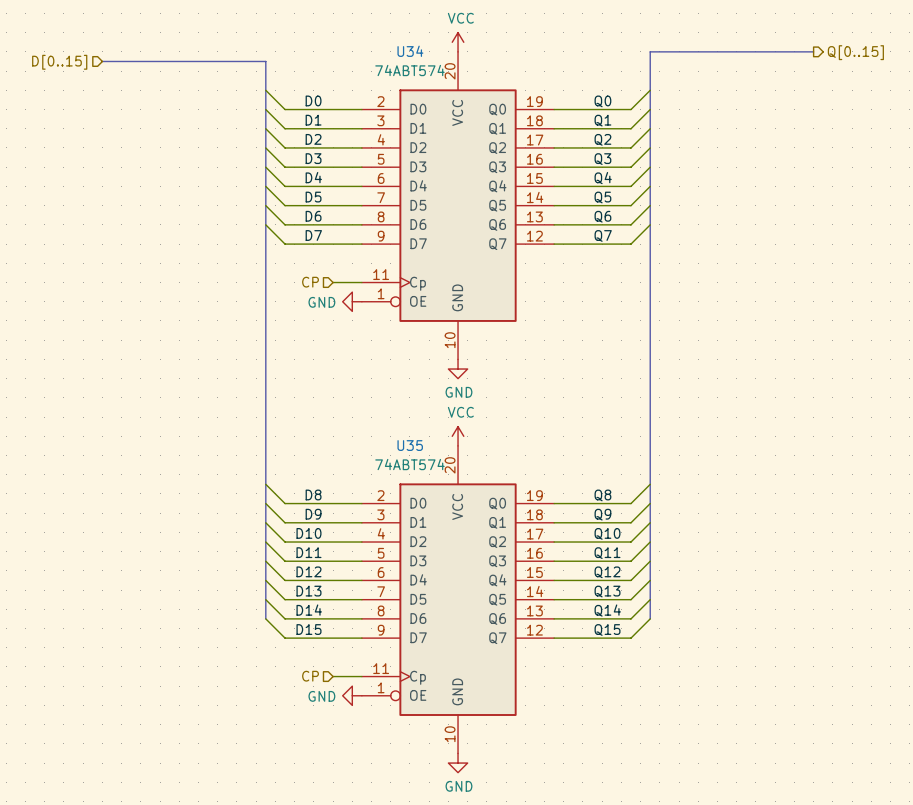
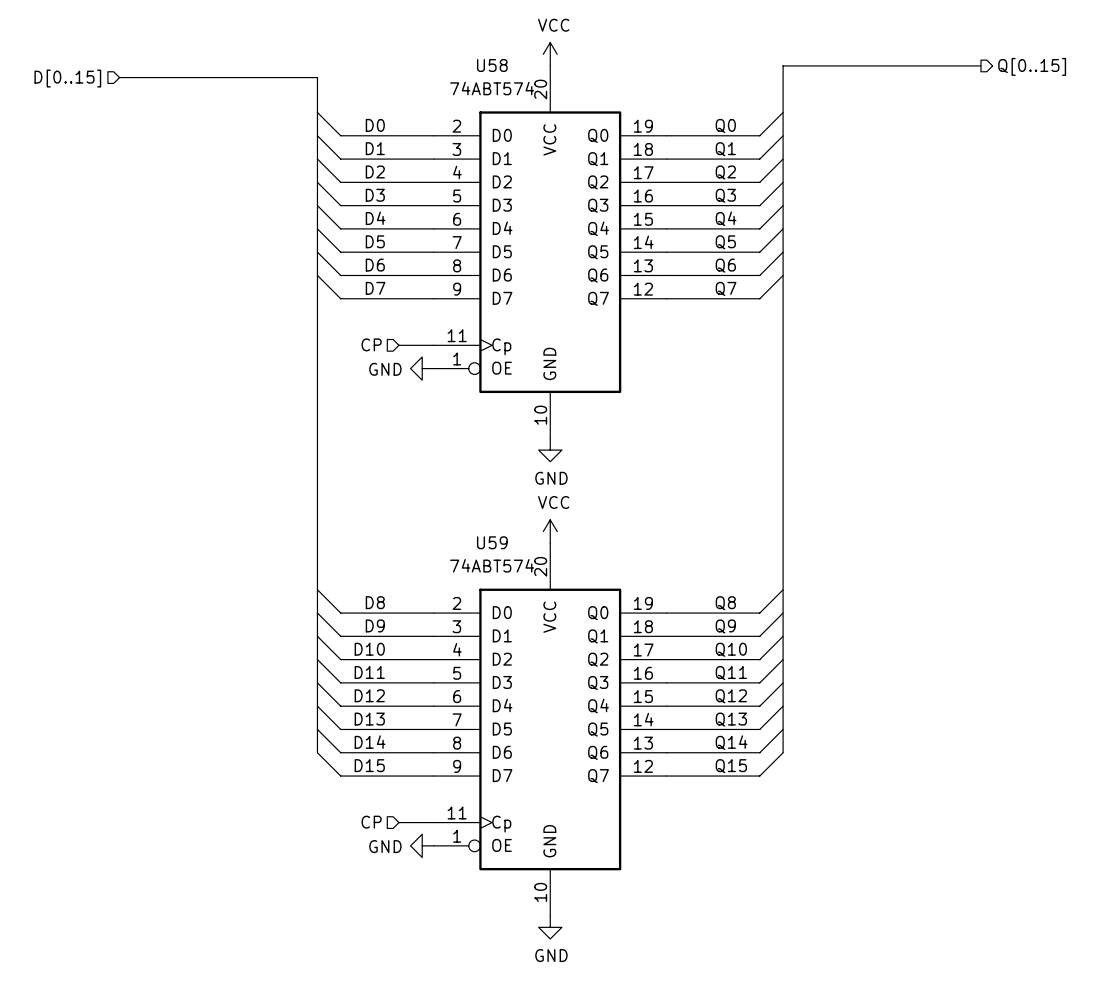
U34 name: U34 (410, 51) -> U58 (492, 65)
U35 name: U35 (410, 445) -> U59 (492, 542)

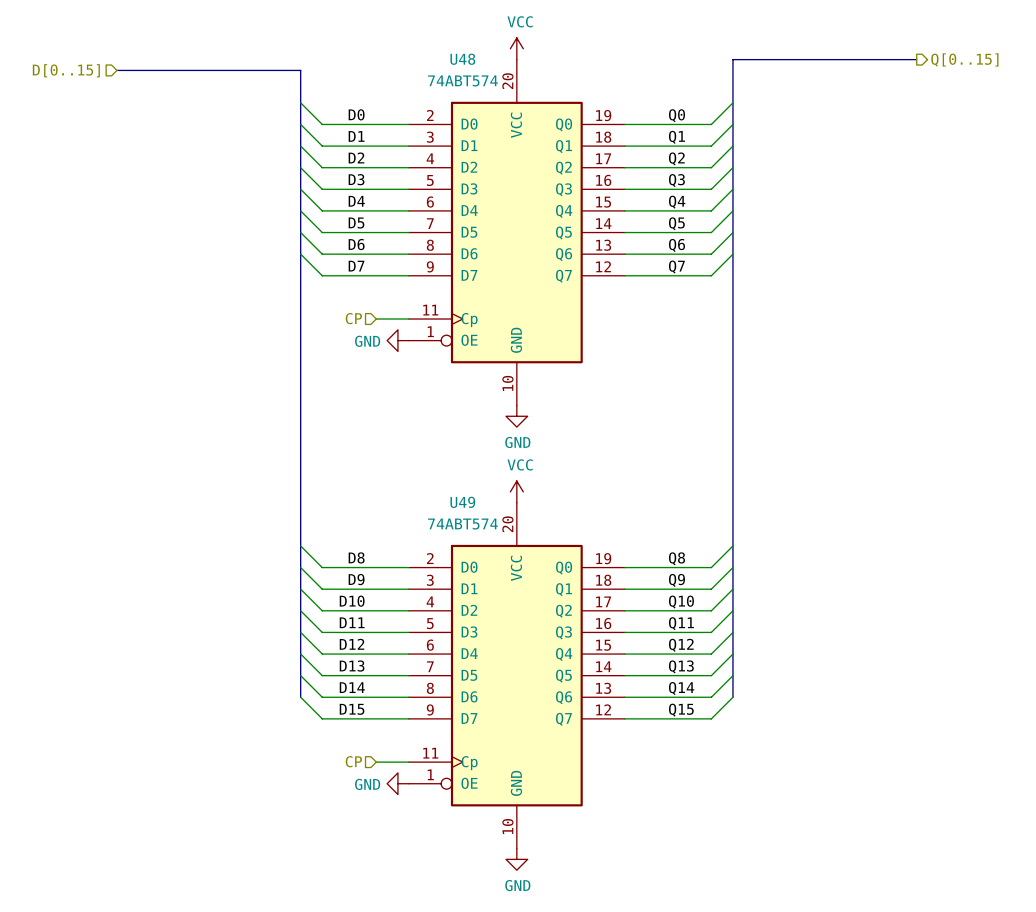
U58 name: U58 (492, 65) -> U48 (462, 59)
U59 name: U59 (492, 542) -> U49 (462, 502)

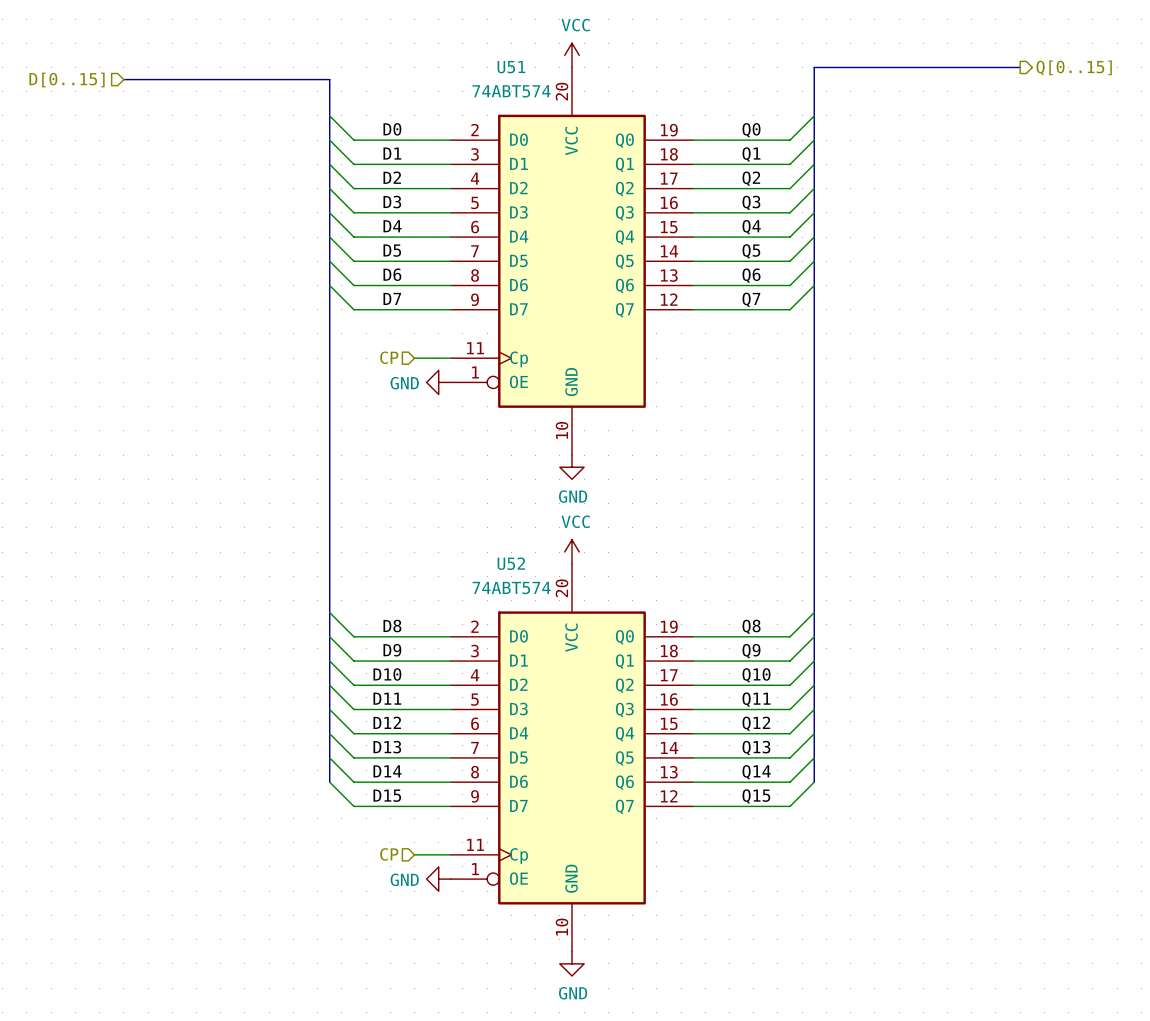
U48 name: U48 (462, 59) -> U51 (511, 67)
U49 name: U49 (462, 502) -> U52 (511, 563)

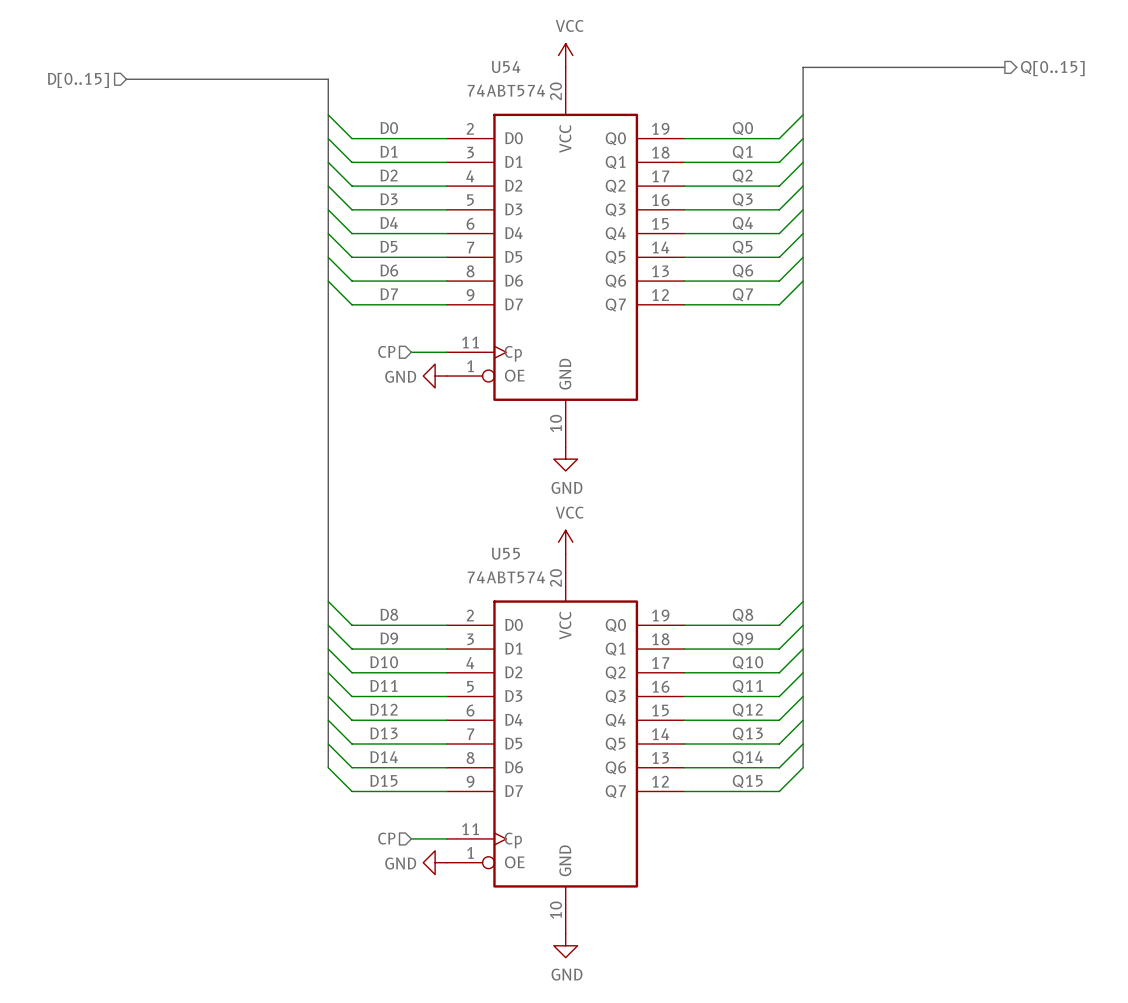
U51 name: U51 (511, 67) -> U54 (506, 67)
U52 name: U52 (511, 563) -> U55 (505, 553)

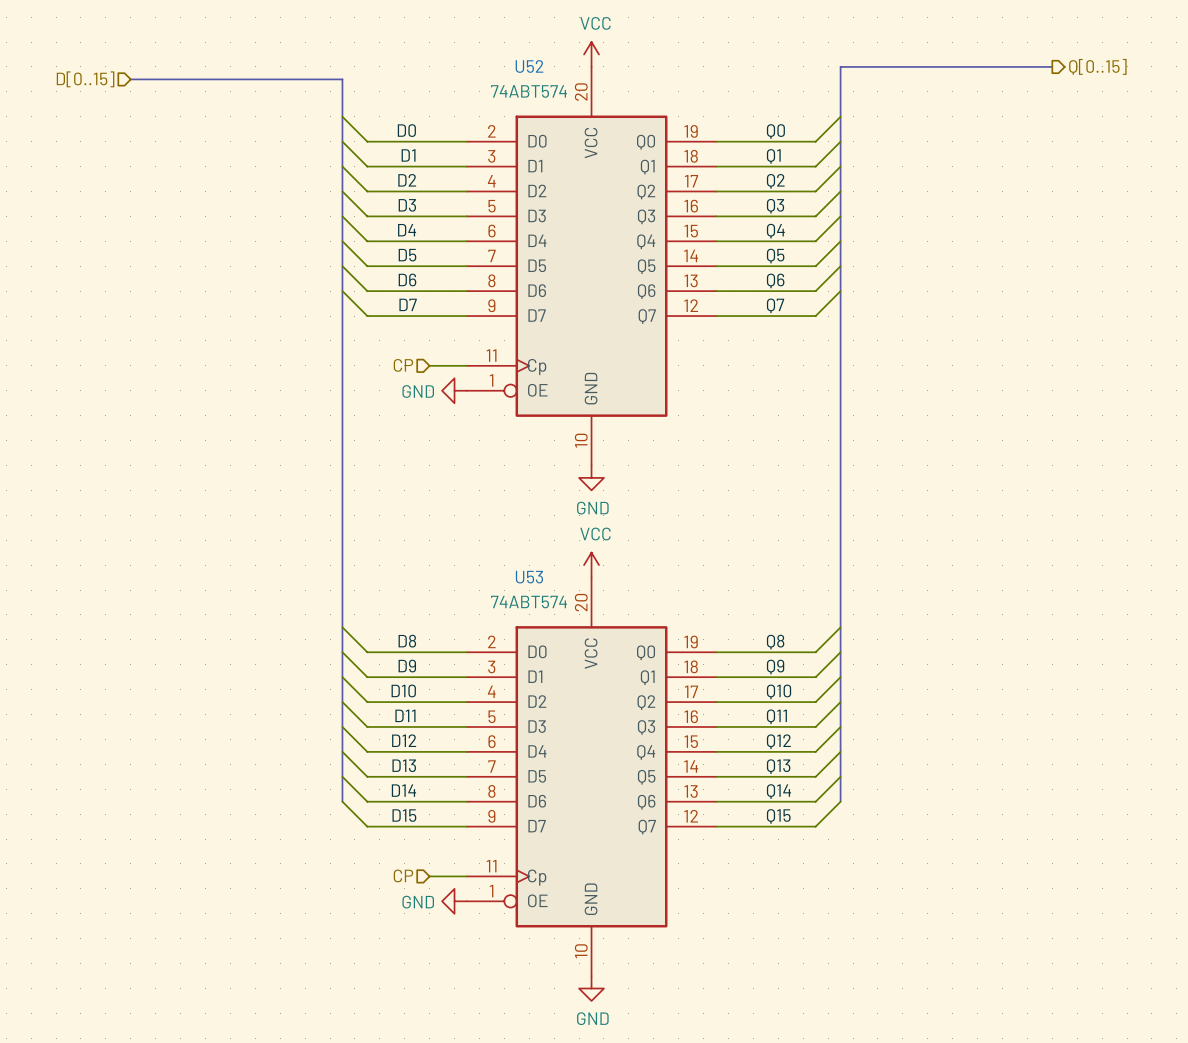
U54 name: U54 (506, 67) -> U52 (529, 66)
U55 name: U55 (505, 553) -> U53 (529, 577)

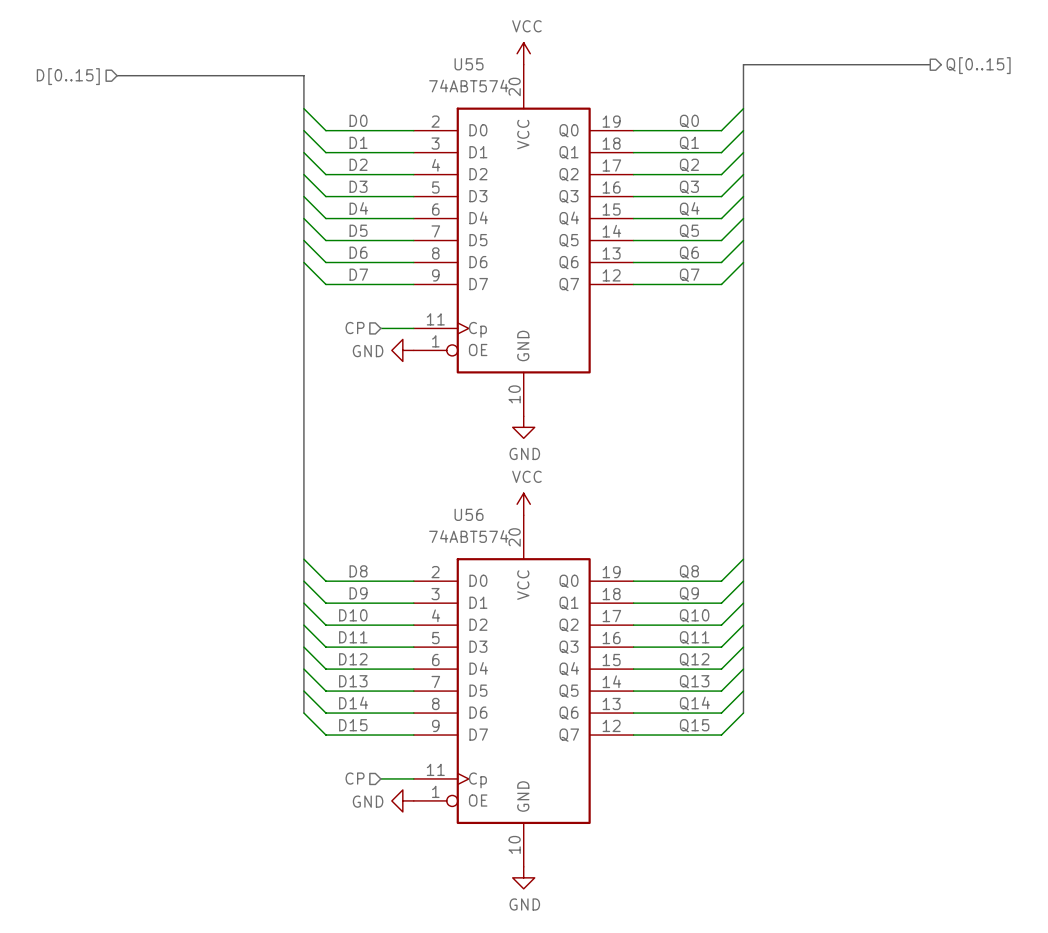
U52 name: U52 (529, 66) -> U55 (469, 64)
U53 name: U53 (529, 577) -> U56 (469, 514)

